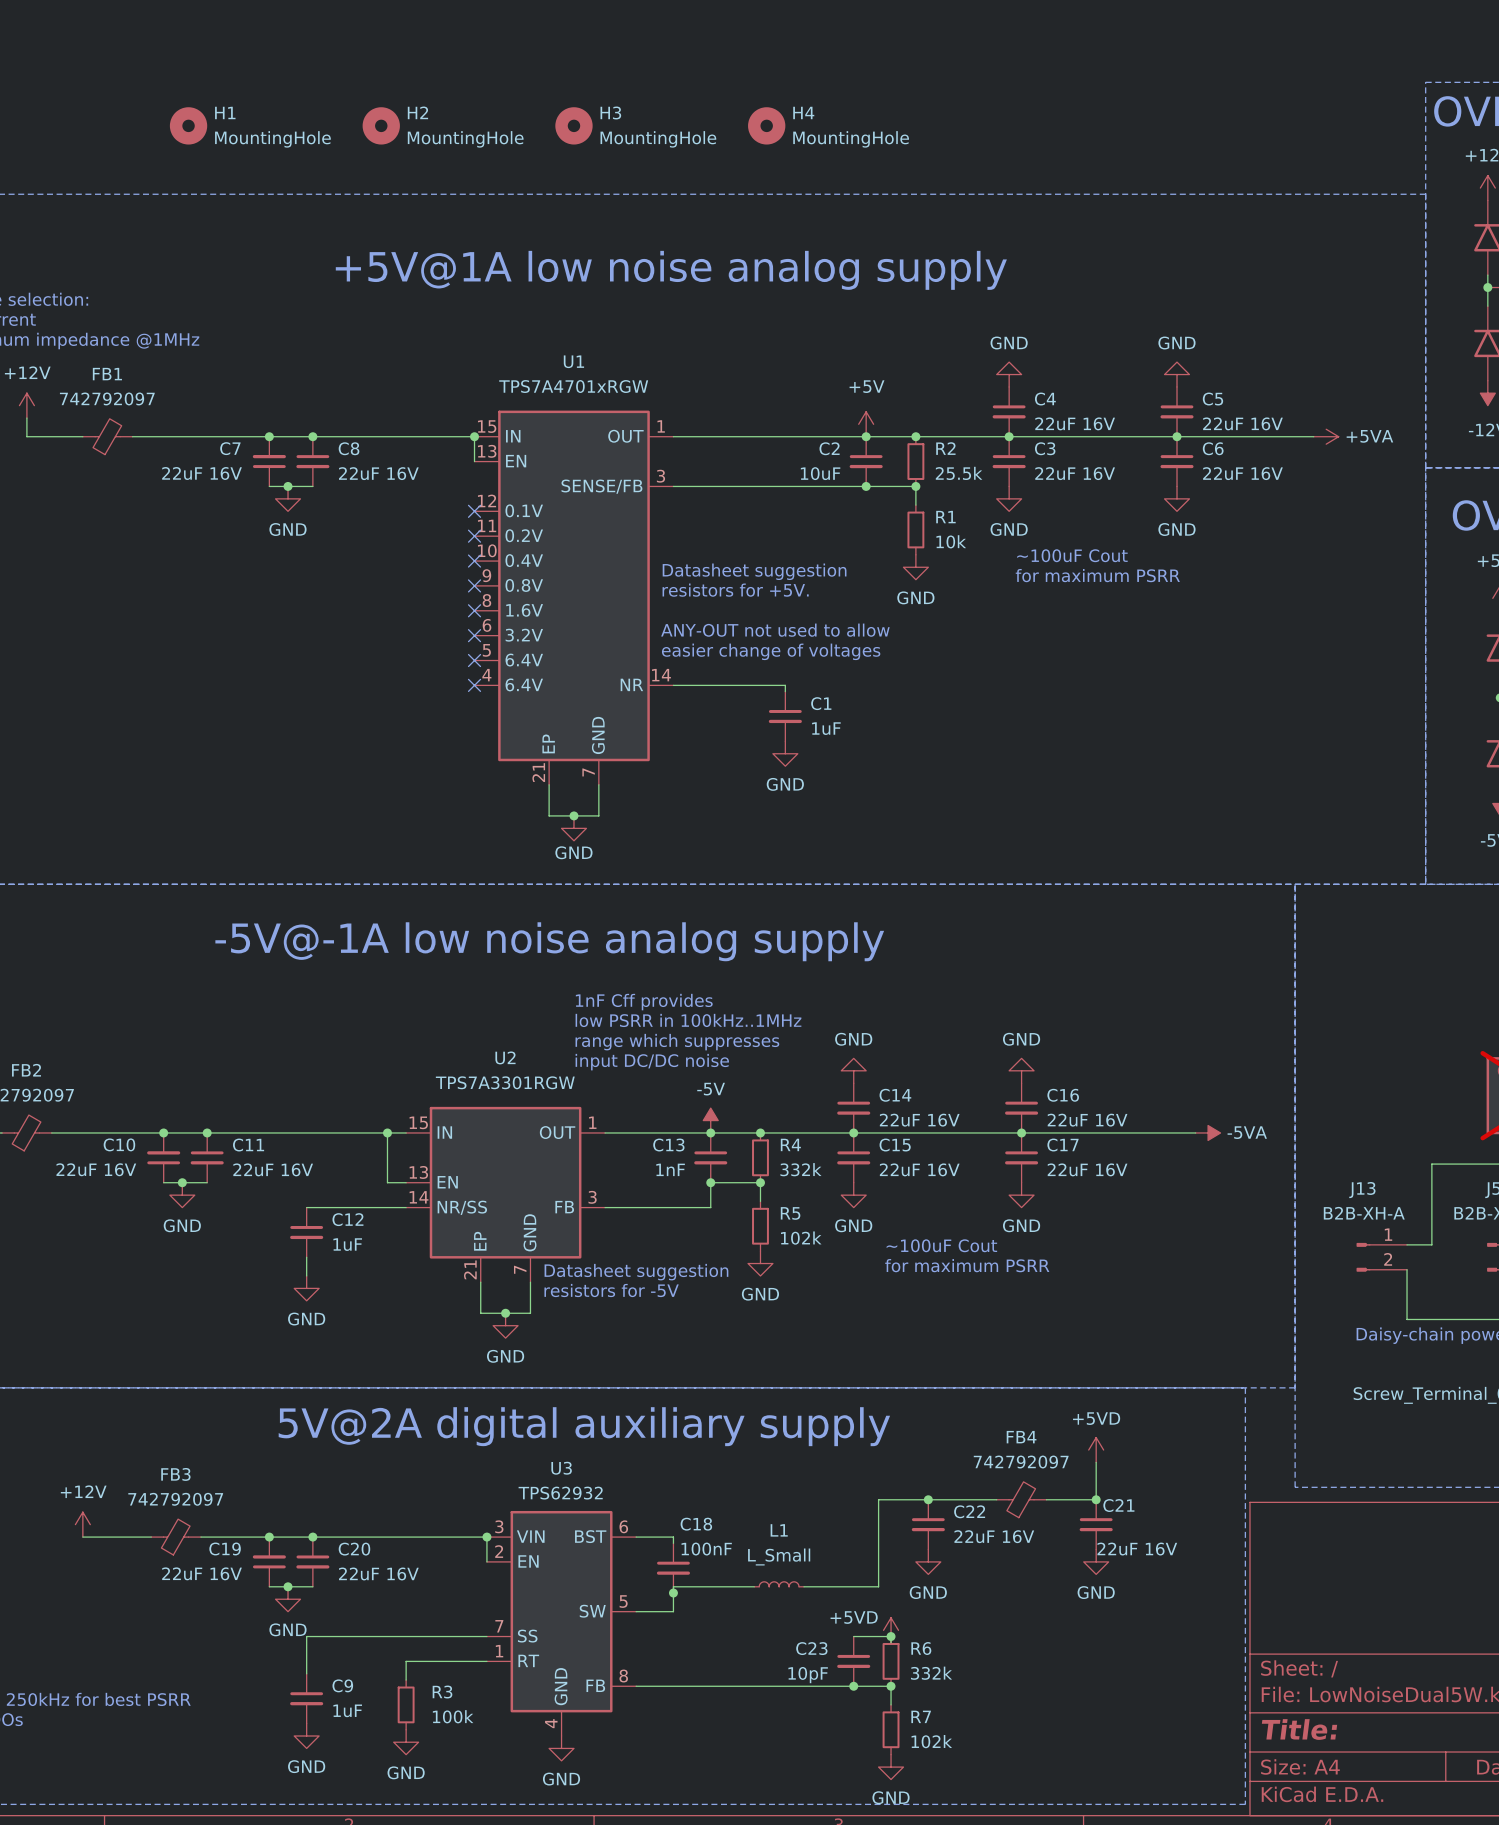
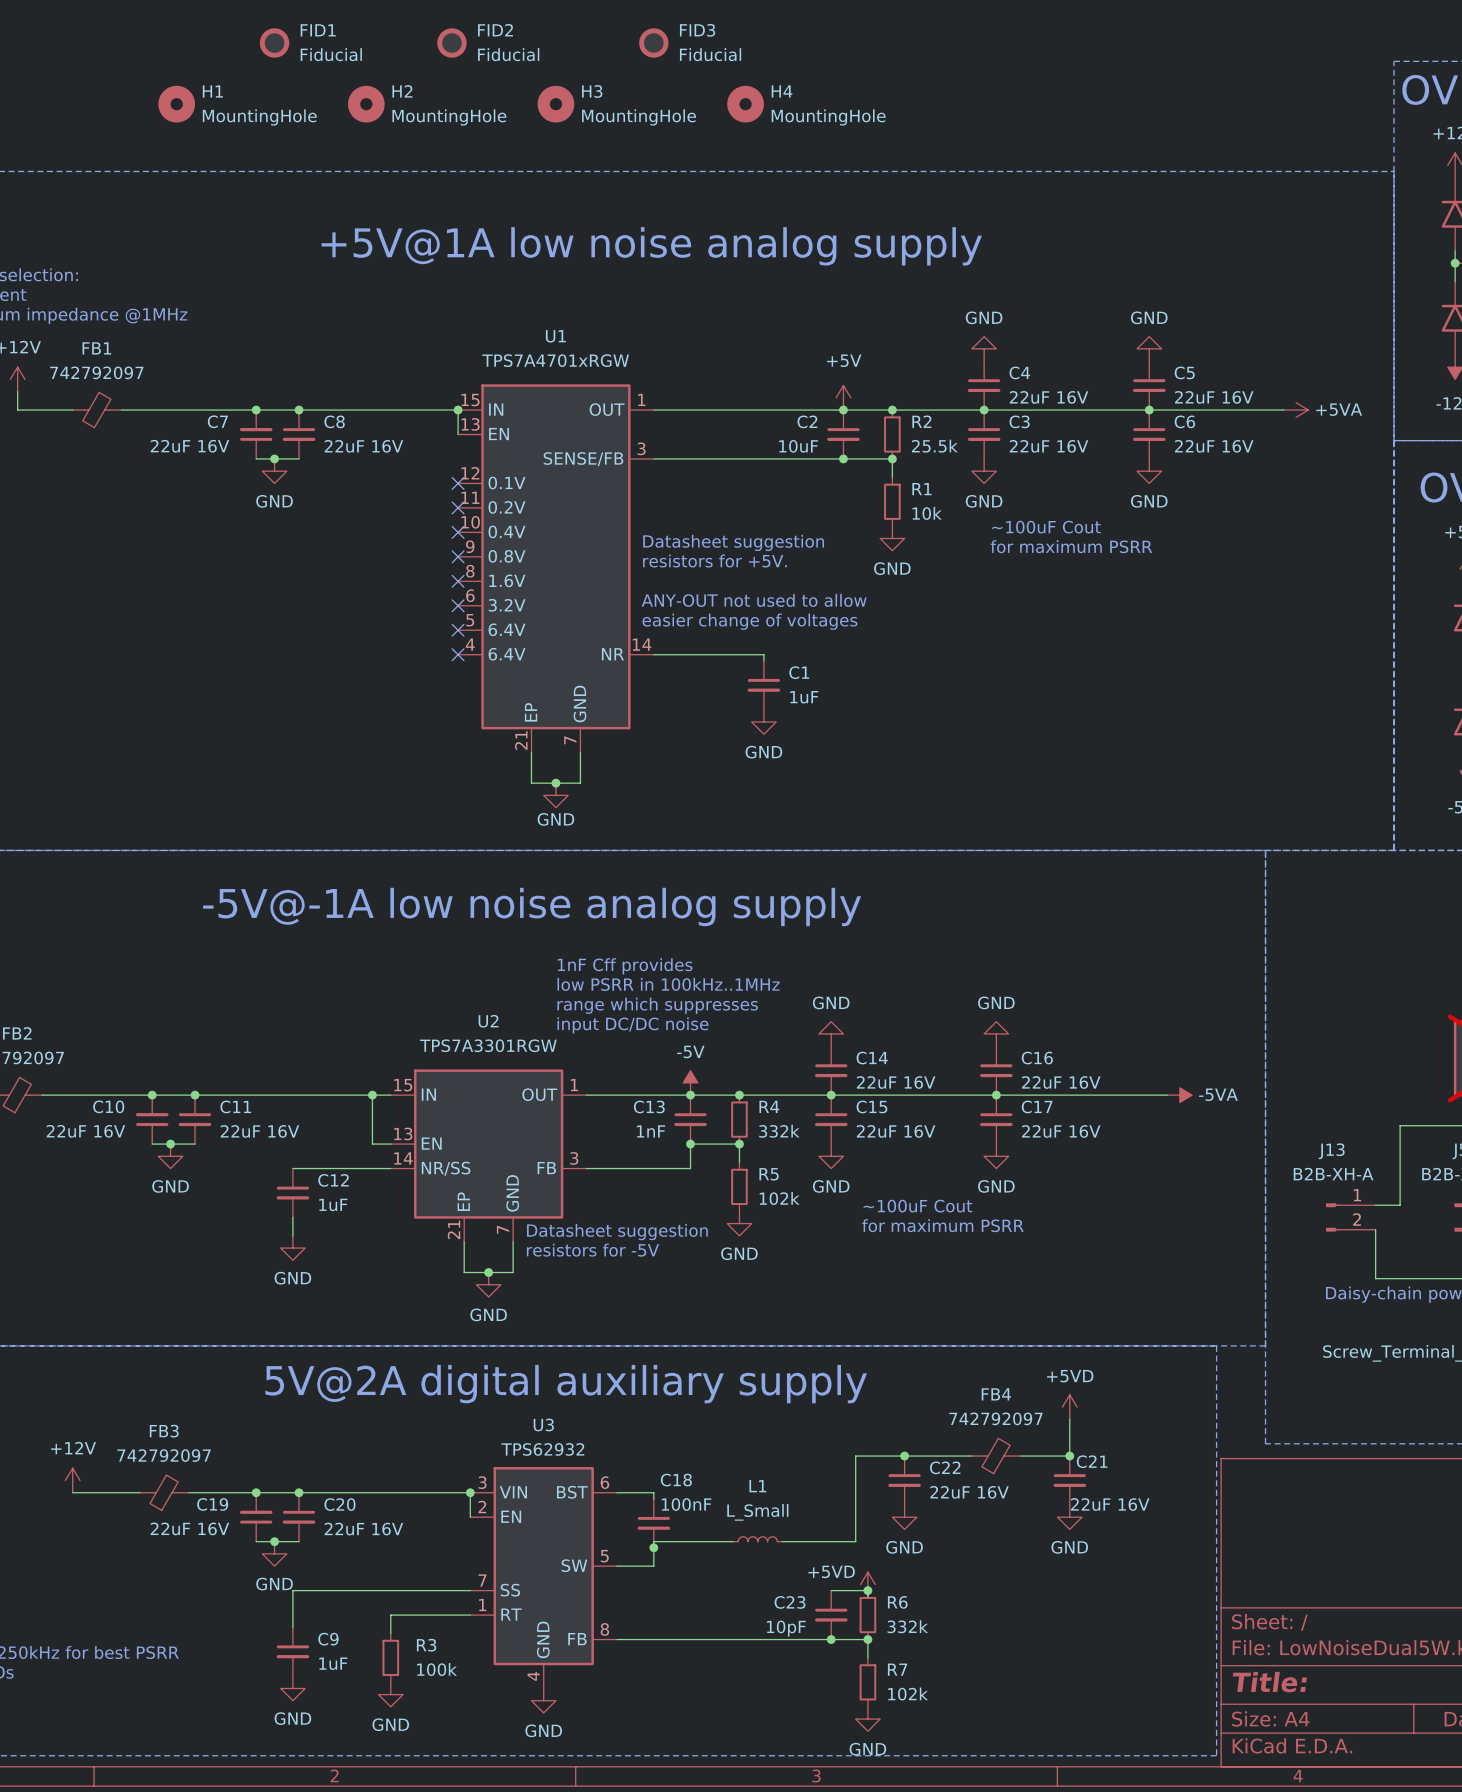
FID1: none -> Fiducial (274, 43)
FID2: none -> Fiducial (451, 43)
FID3: none -> Fiducial (653, 43)

